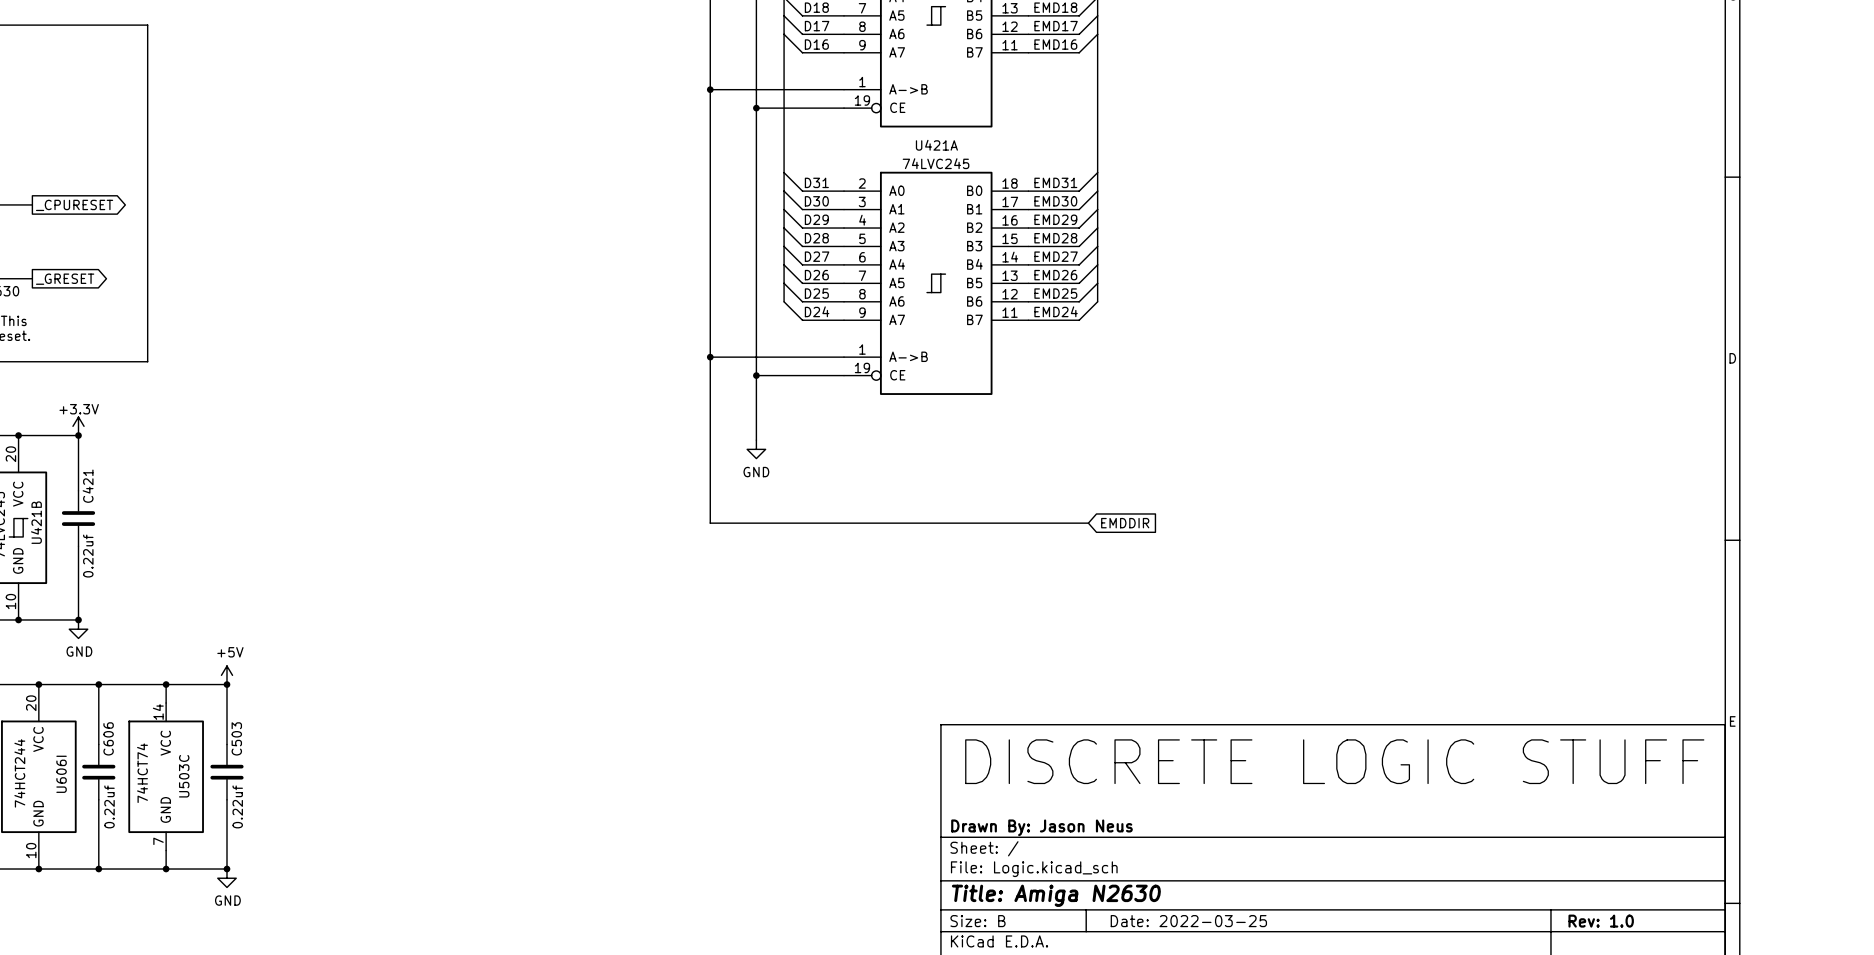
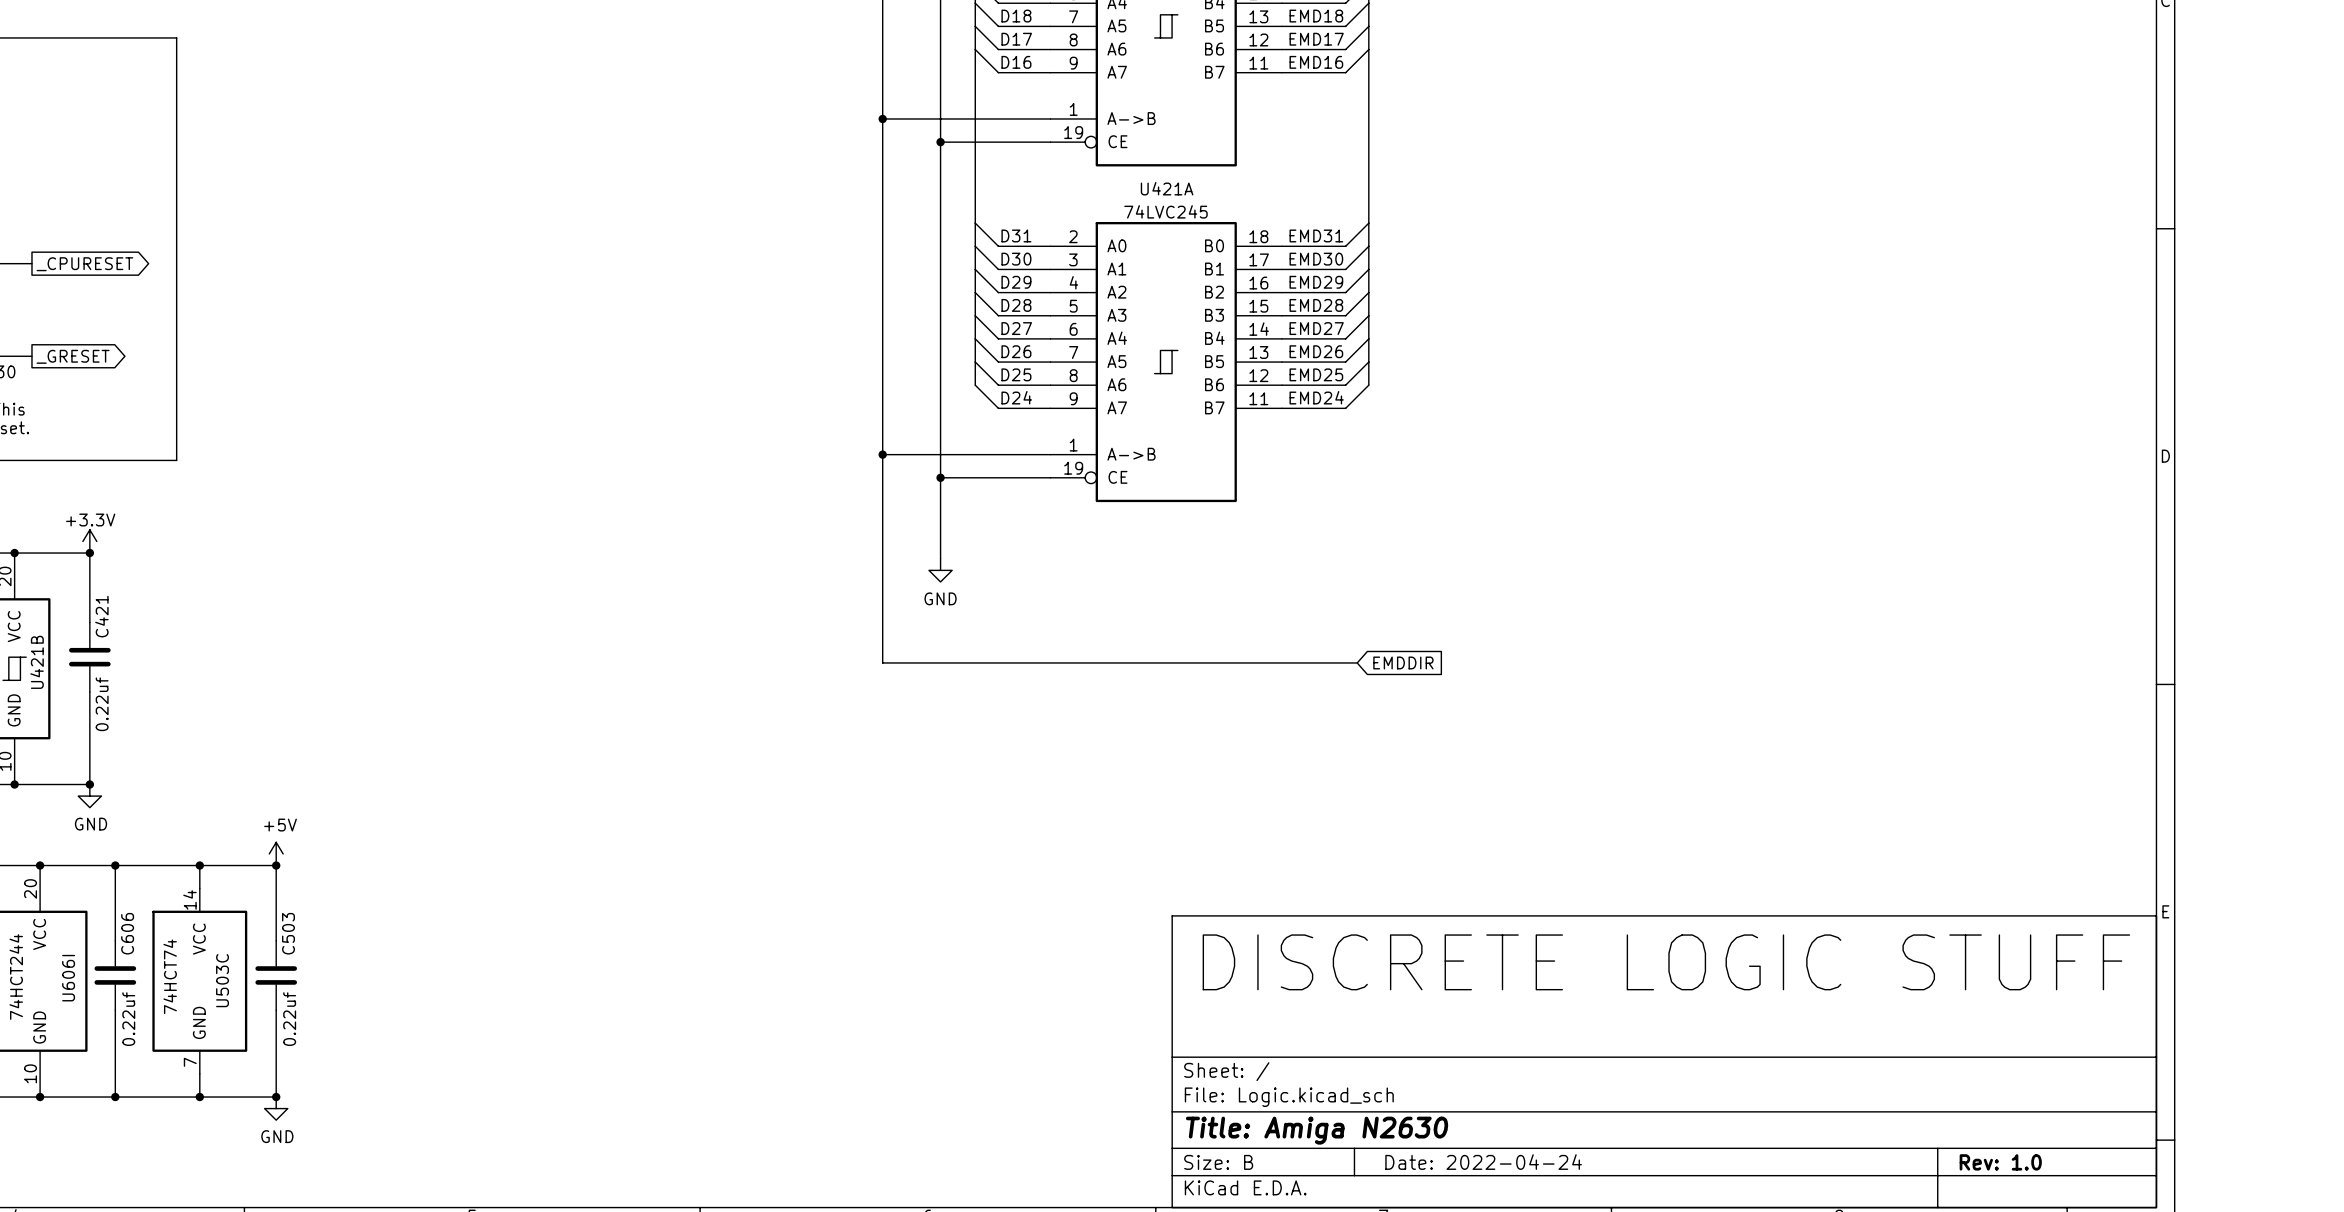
title block: Drawn By: Jason Neus (1041, 827) -> none
title block: Date: 2022-03-25 (1188, 921) -> Date: 2022-04-24 (1483, 1162)

